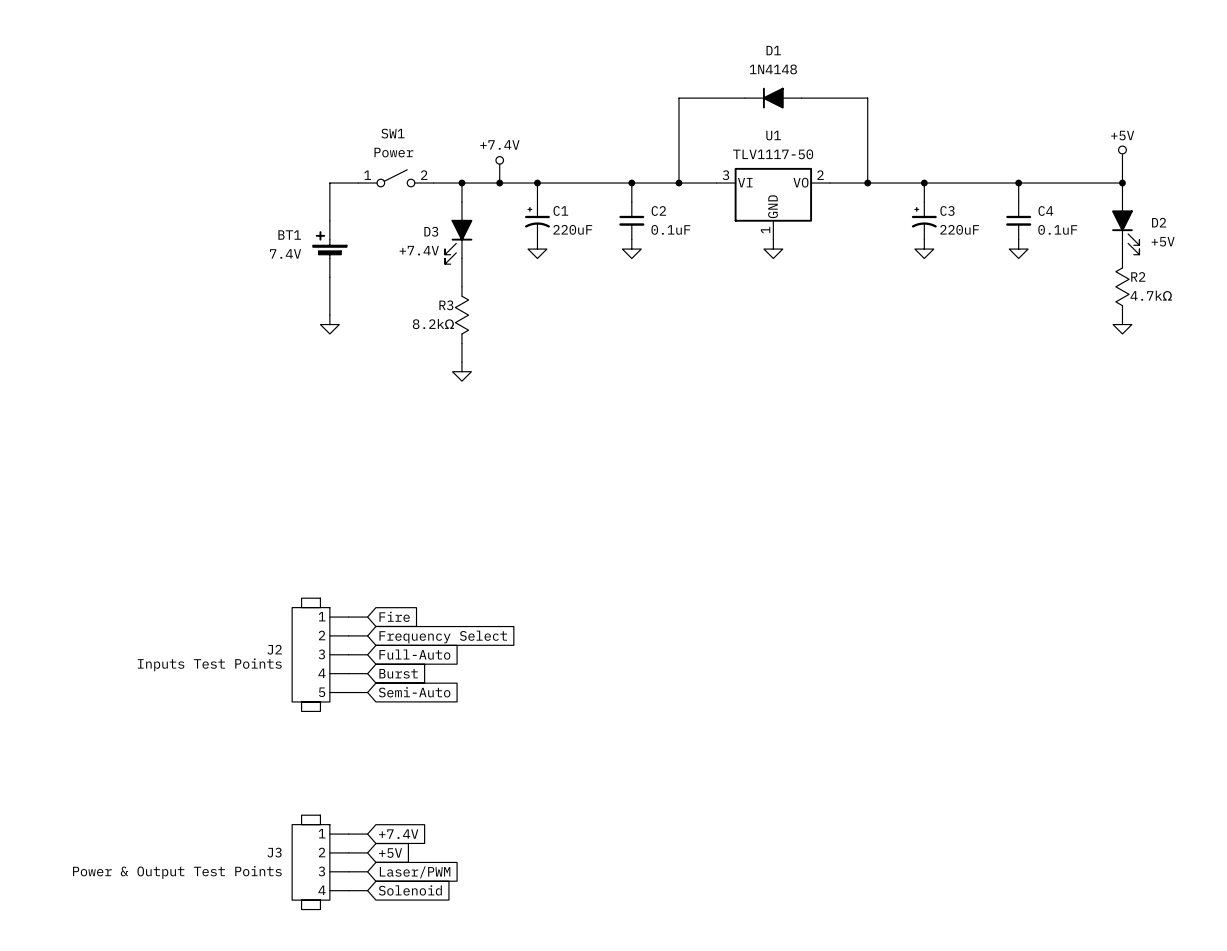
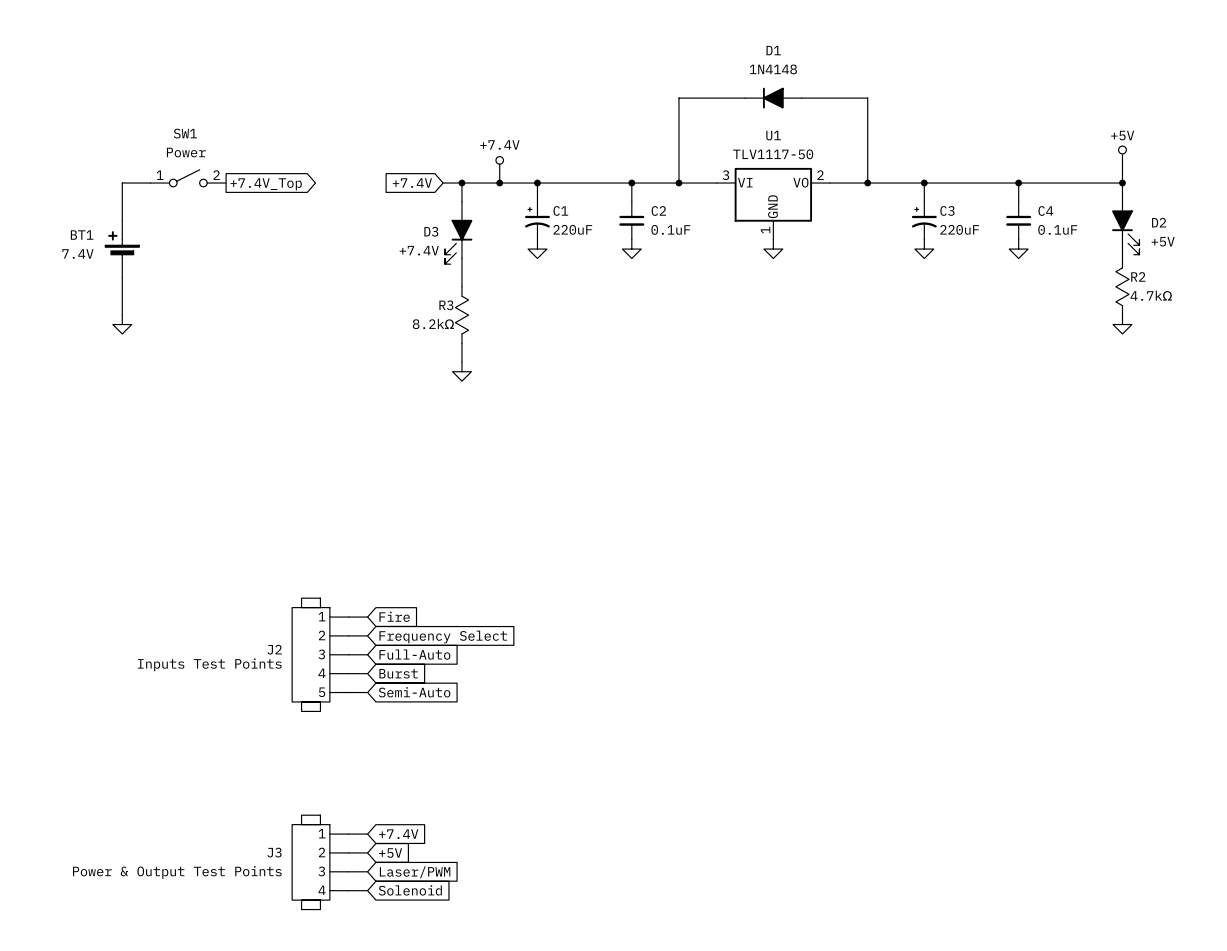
SW1 position: (395, 178) -> (188, 178)
wire: none -> (150, 183) (122, 183) (122, 220)
wire: (358, 183) (329, 183) (329, 220) -> none
global label: none -> +7.4V (412, 183)
wire: (433, 183) (443, 183) -> none
global label: none -> +7.4V_Top (266, 184)
BT1 position: (329, 249) -> (122, 249)
wire: none -> (122, 277) (122, 315)
wire: (329, 277) (329, 315) -> none
power symbol: none -> (122, 324)
power symbol: (329, 324) -> none

